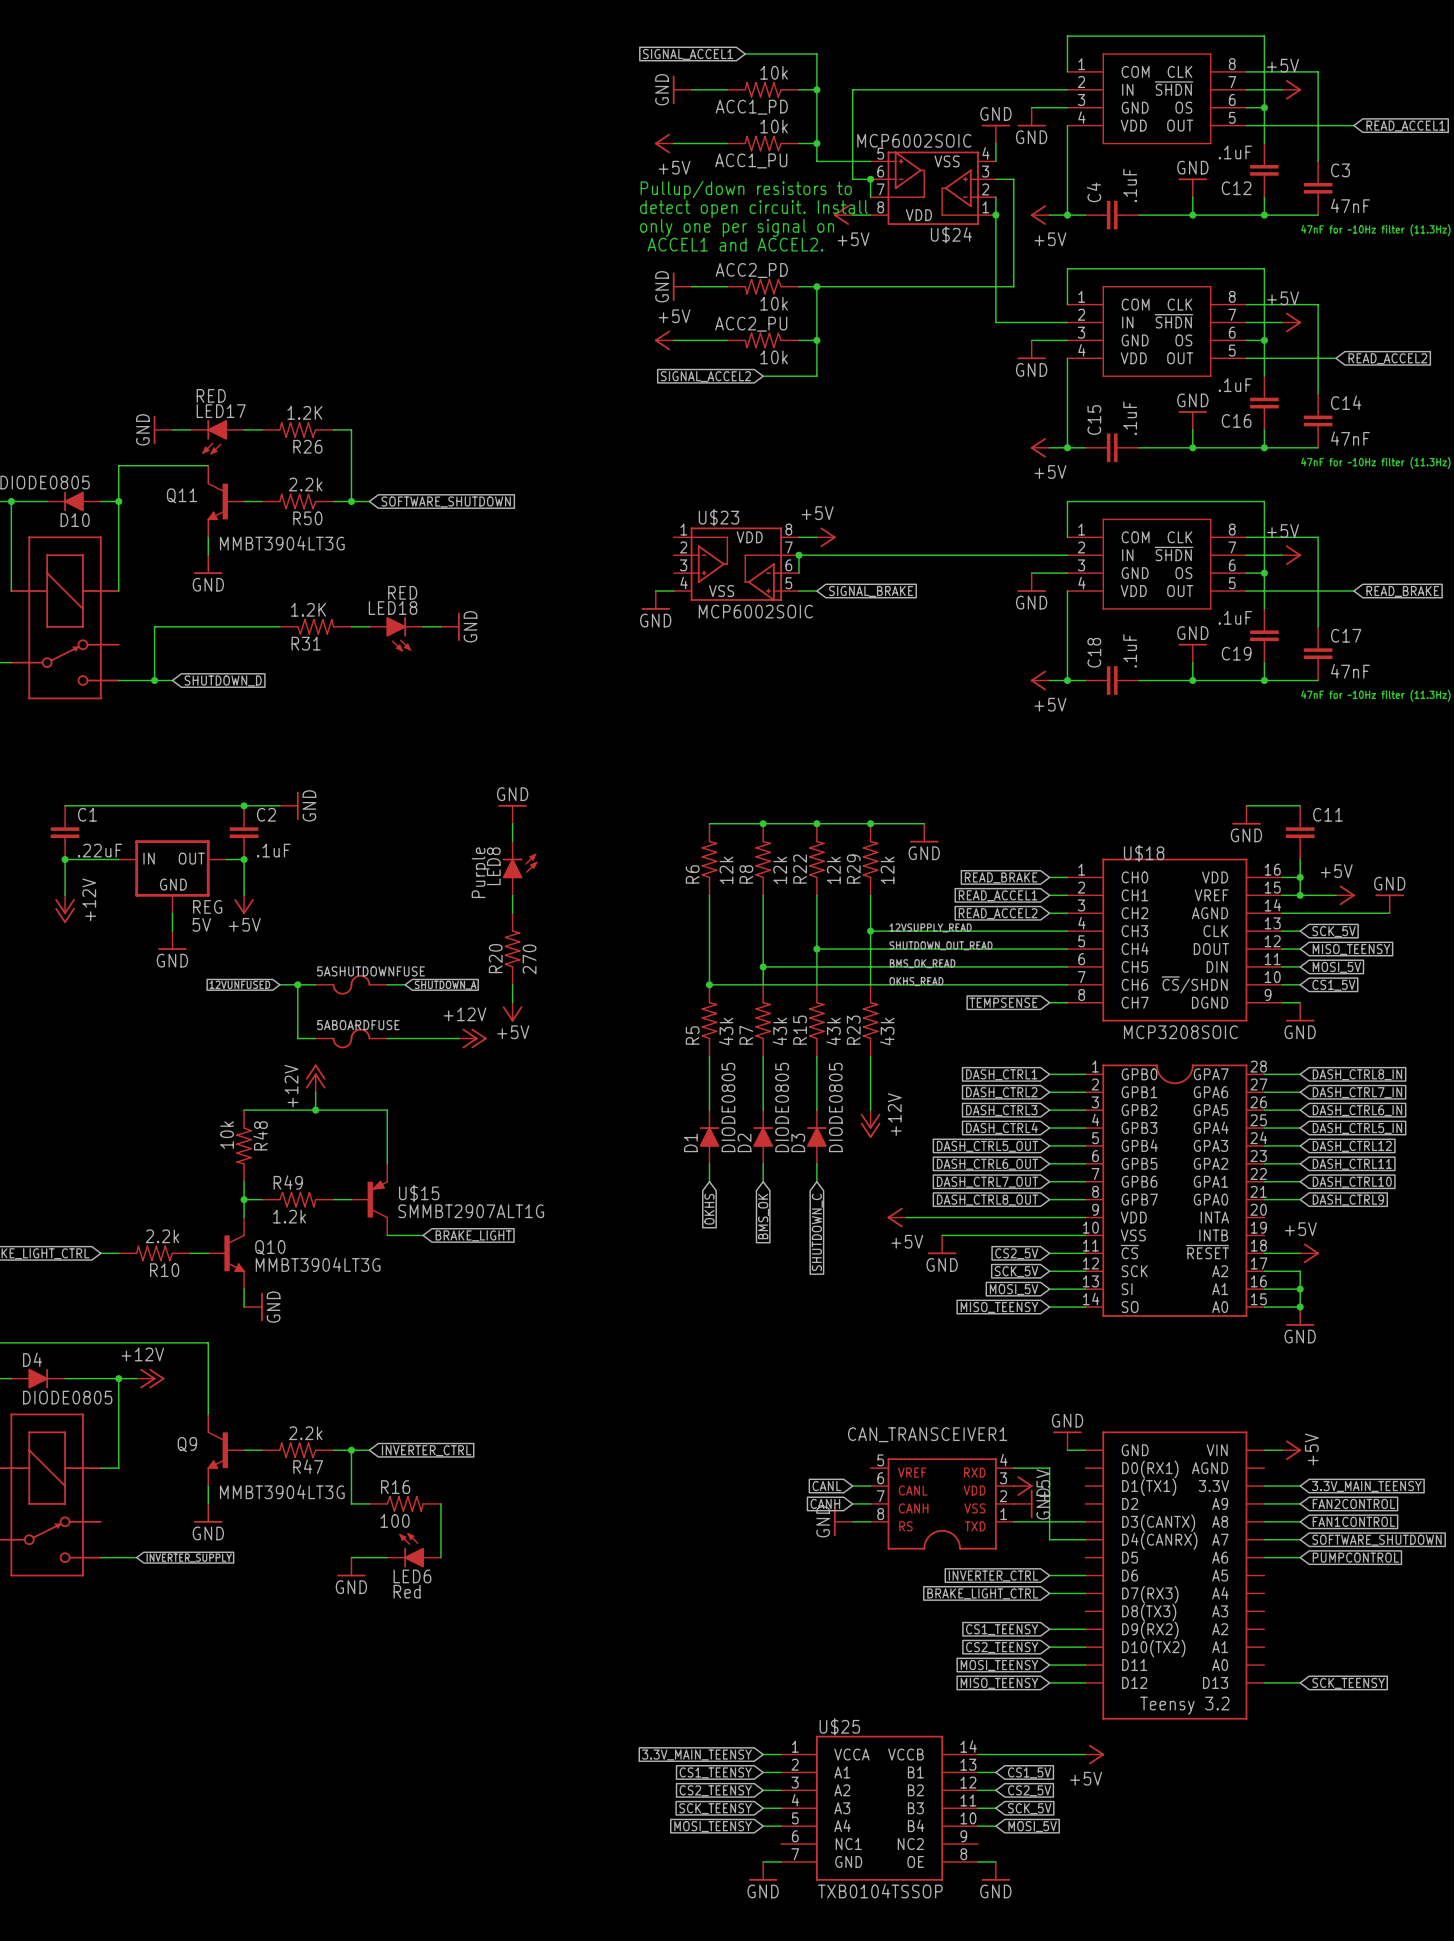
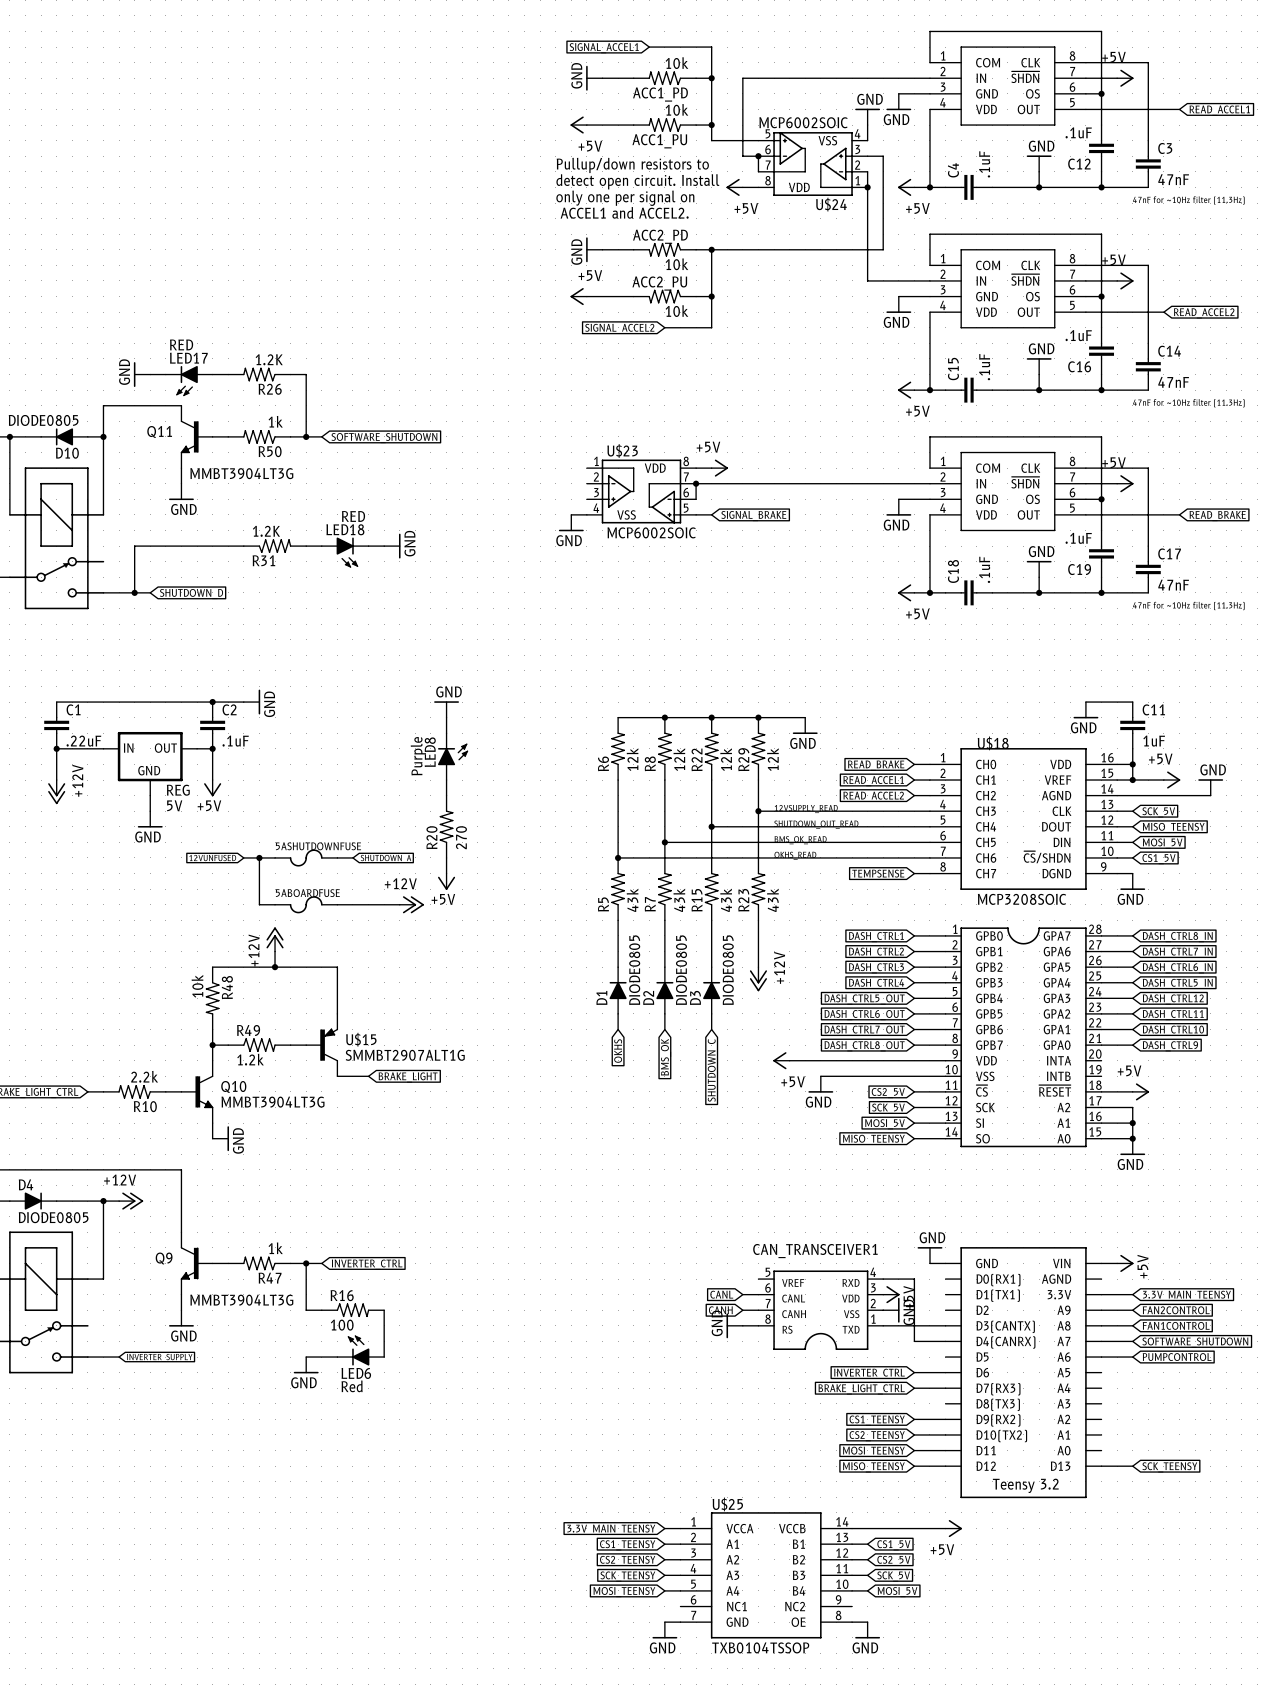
R50 value: 2.2k (305, 484) -> 1k (275, 421)
C11 value: none -> 1uF (1154, 741)
R47 value: 2.2k (305, 1433) -> 1k (275, 1248)

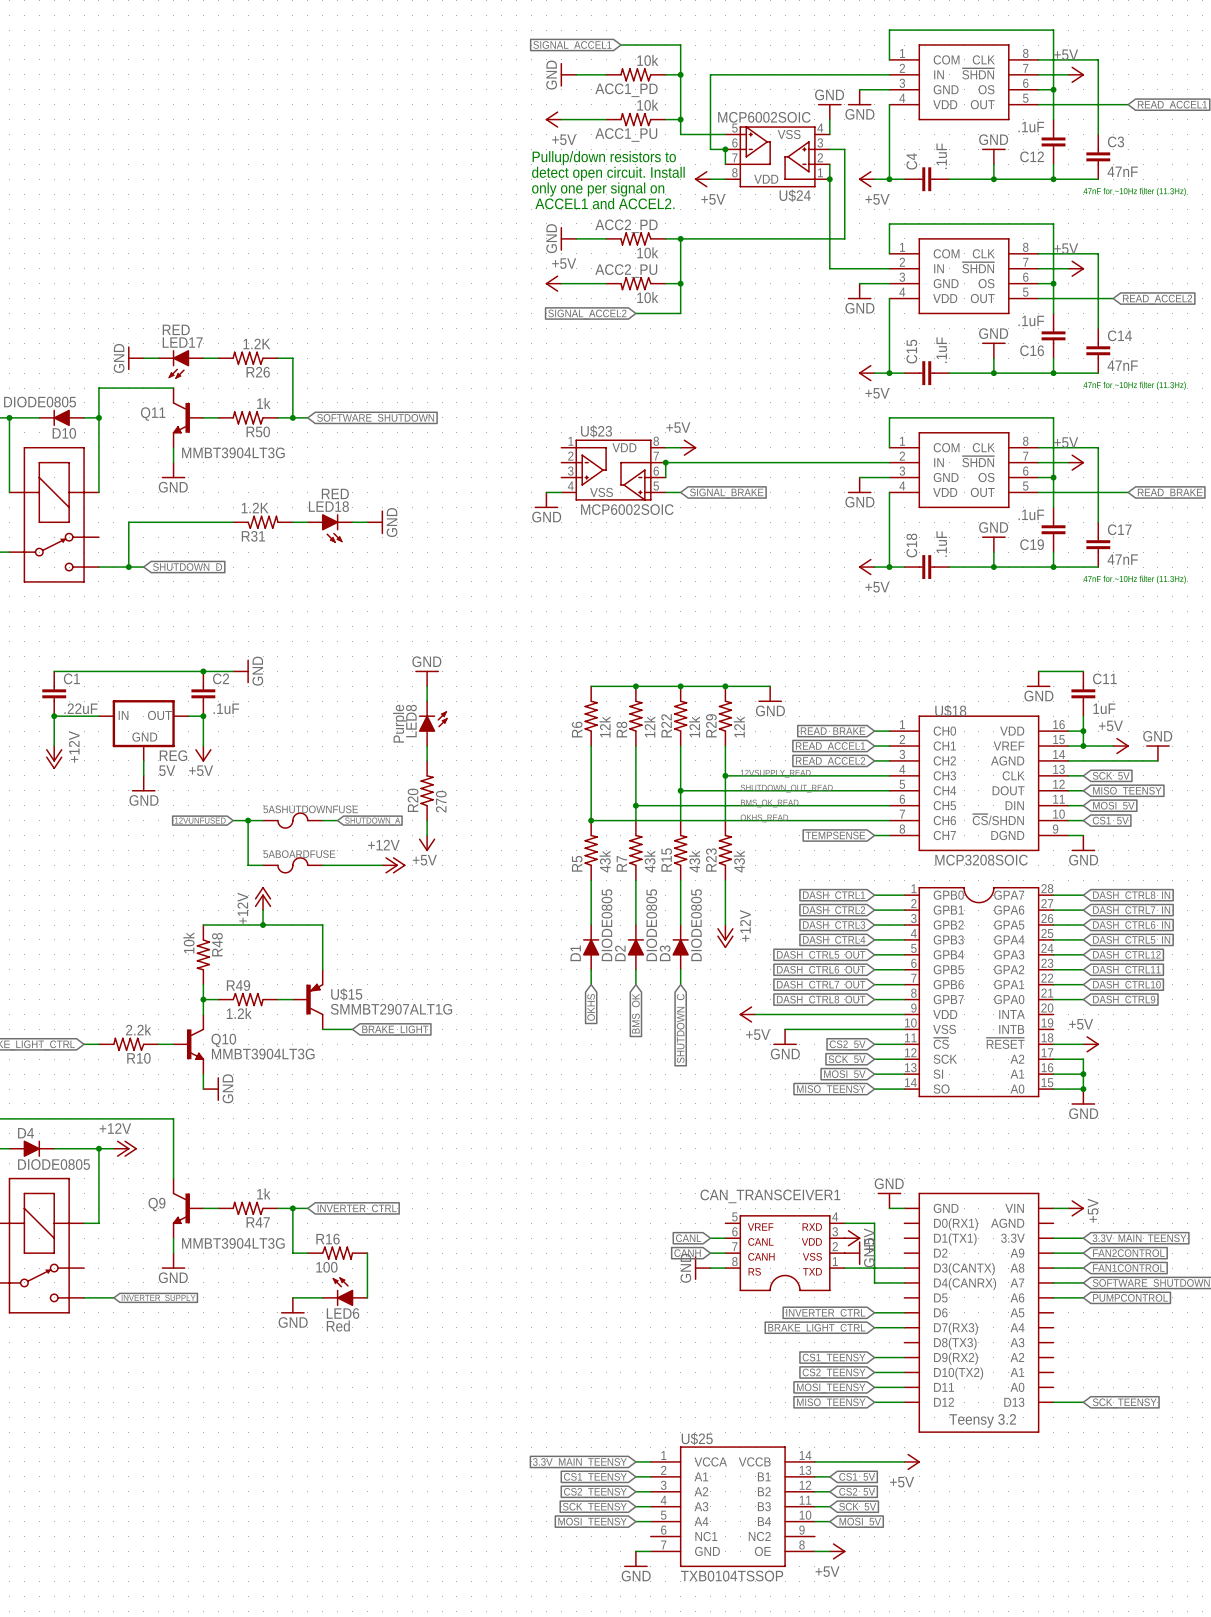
power symbol: none -> +5V (837, 1551)
power symbol: GND (867, 1630) -> none

